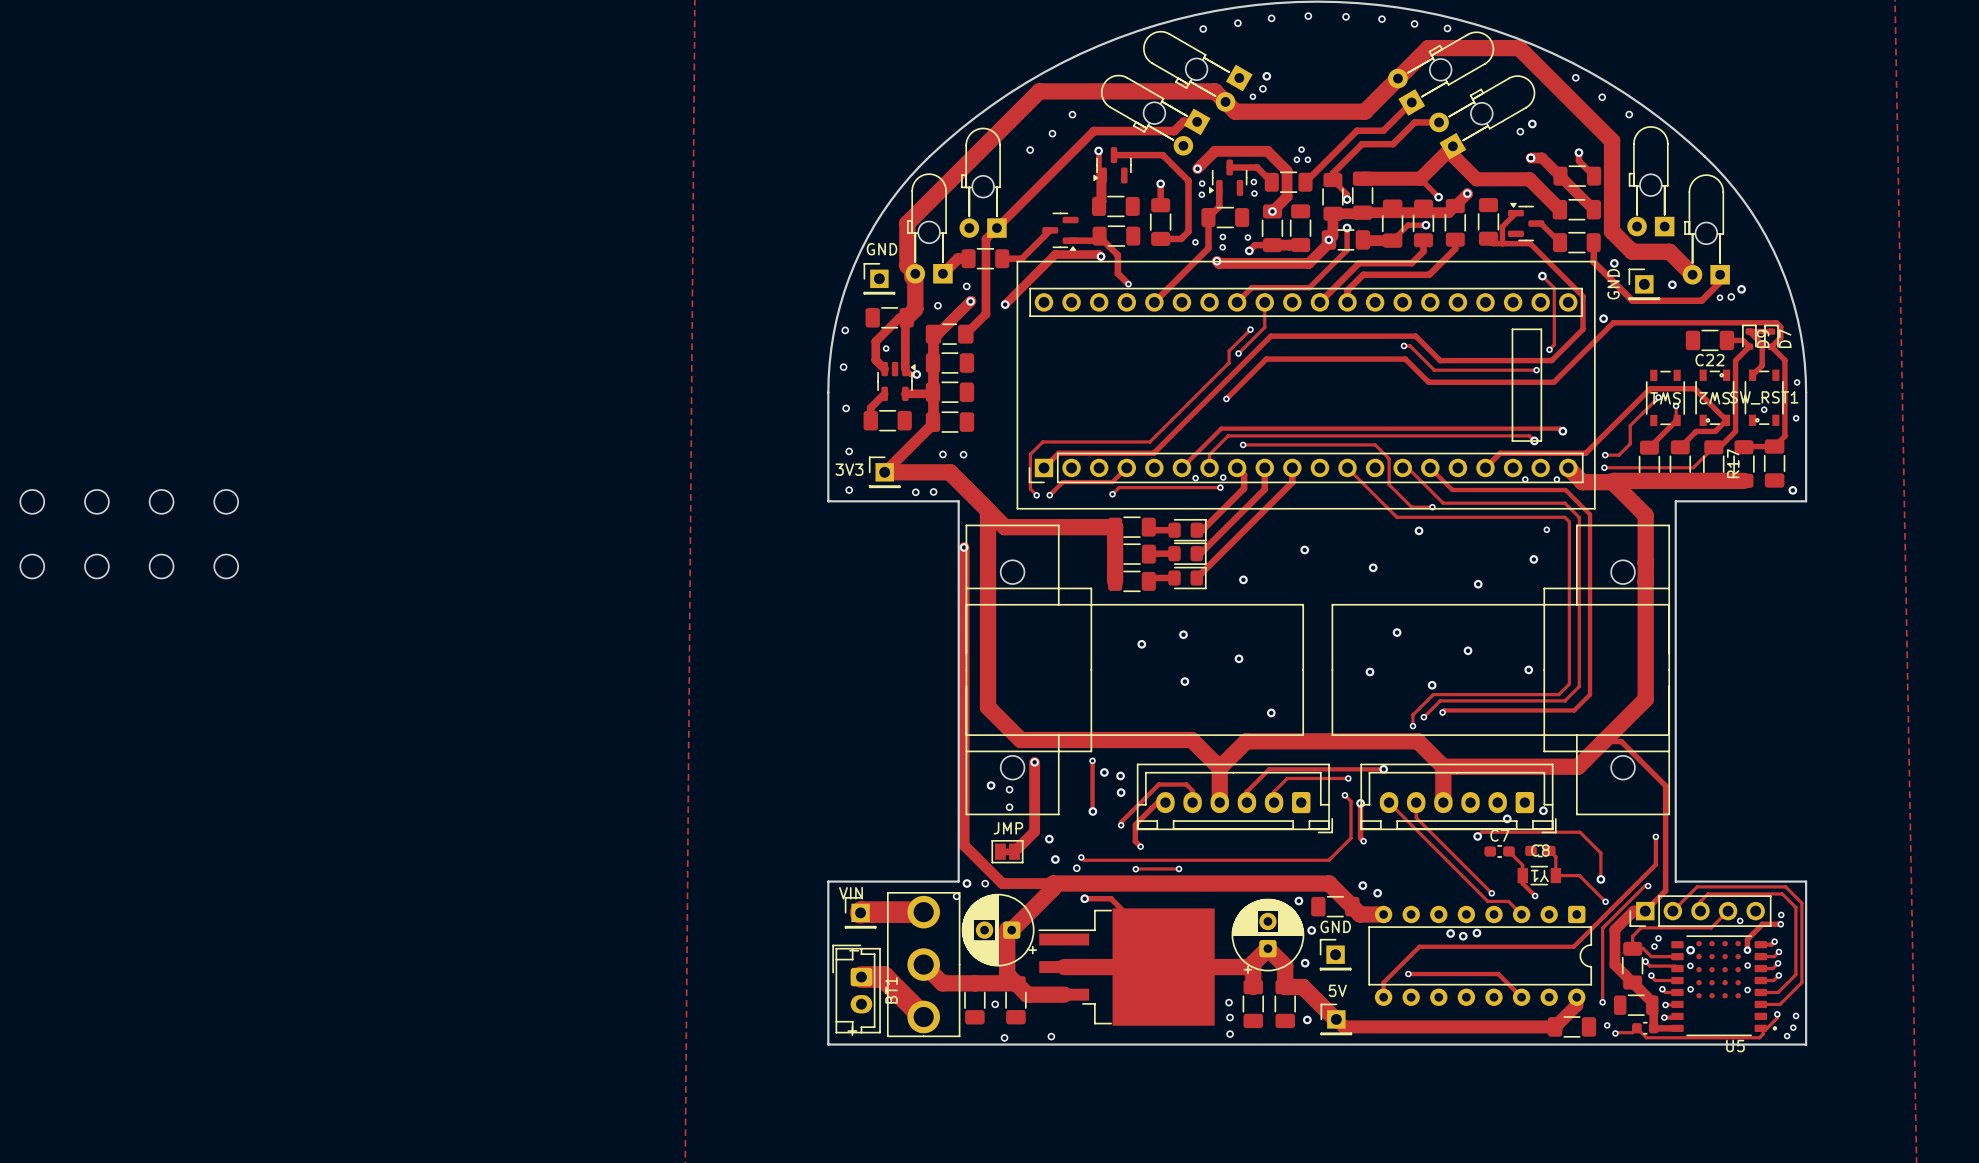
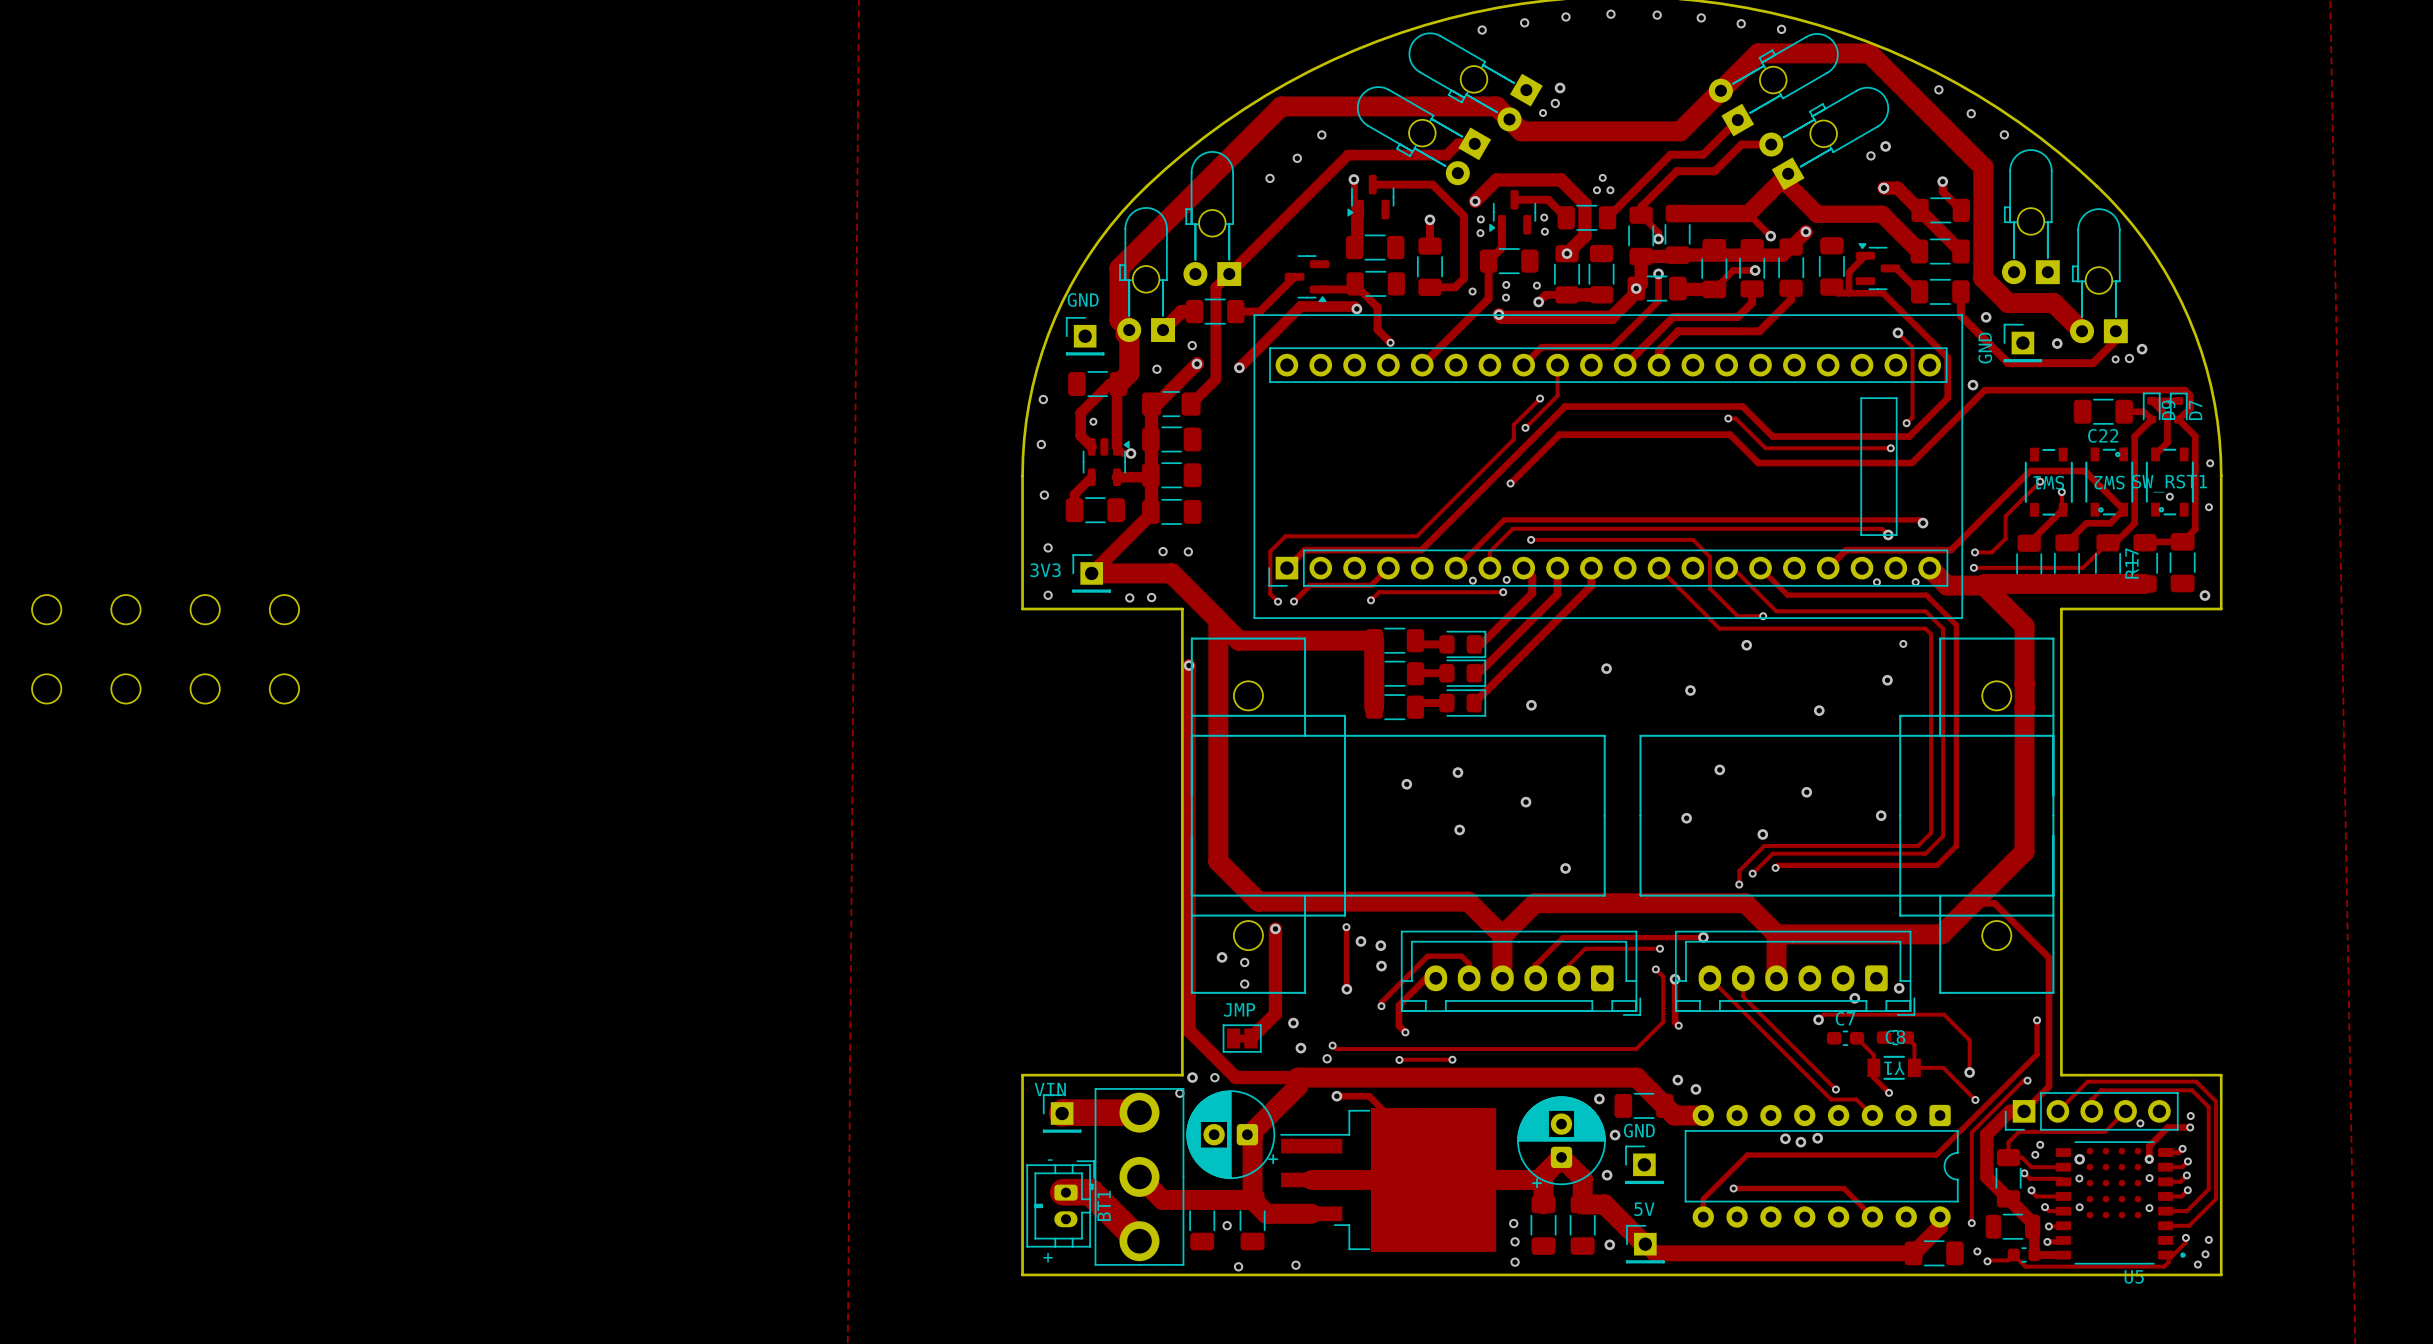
track: (1053, 888) (1011, 930) -> (1298, 1083) (1298, 1086) (1249, 1134) (1252, 1137) (1252, 1199)
track: (1007, 929) (1007, 974) (1015, 983) -> none
BT1 footprint: [832, 944, 881, 1034] -> [1026, 1160, 1095, 1248]

